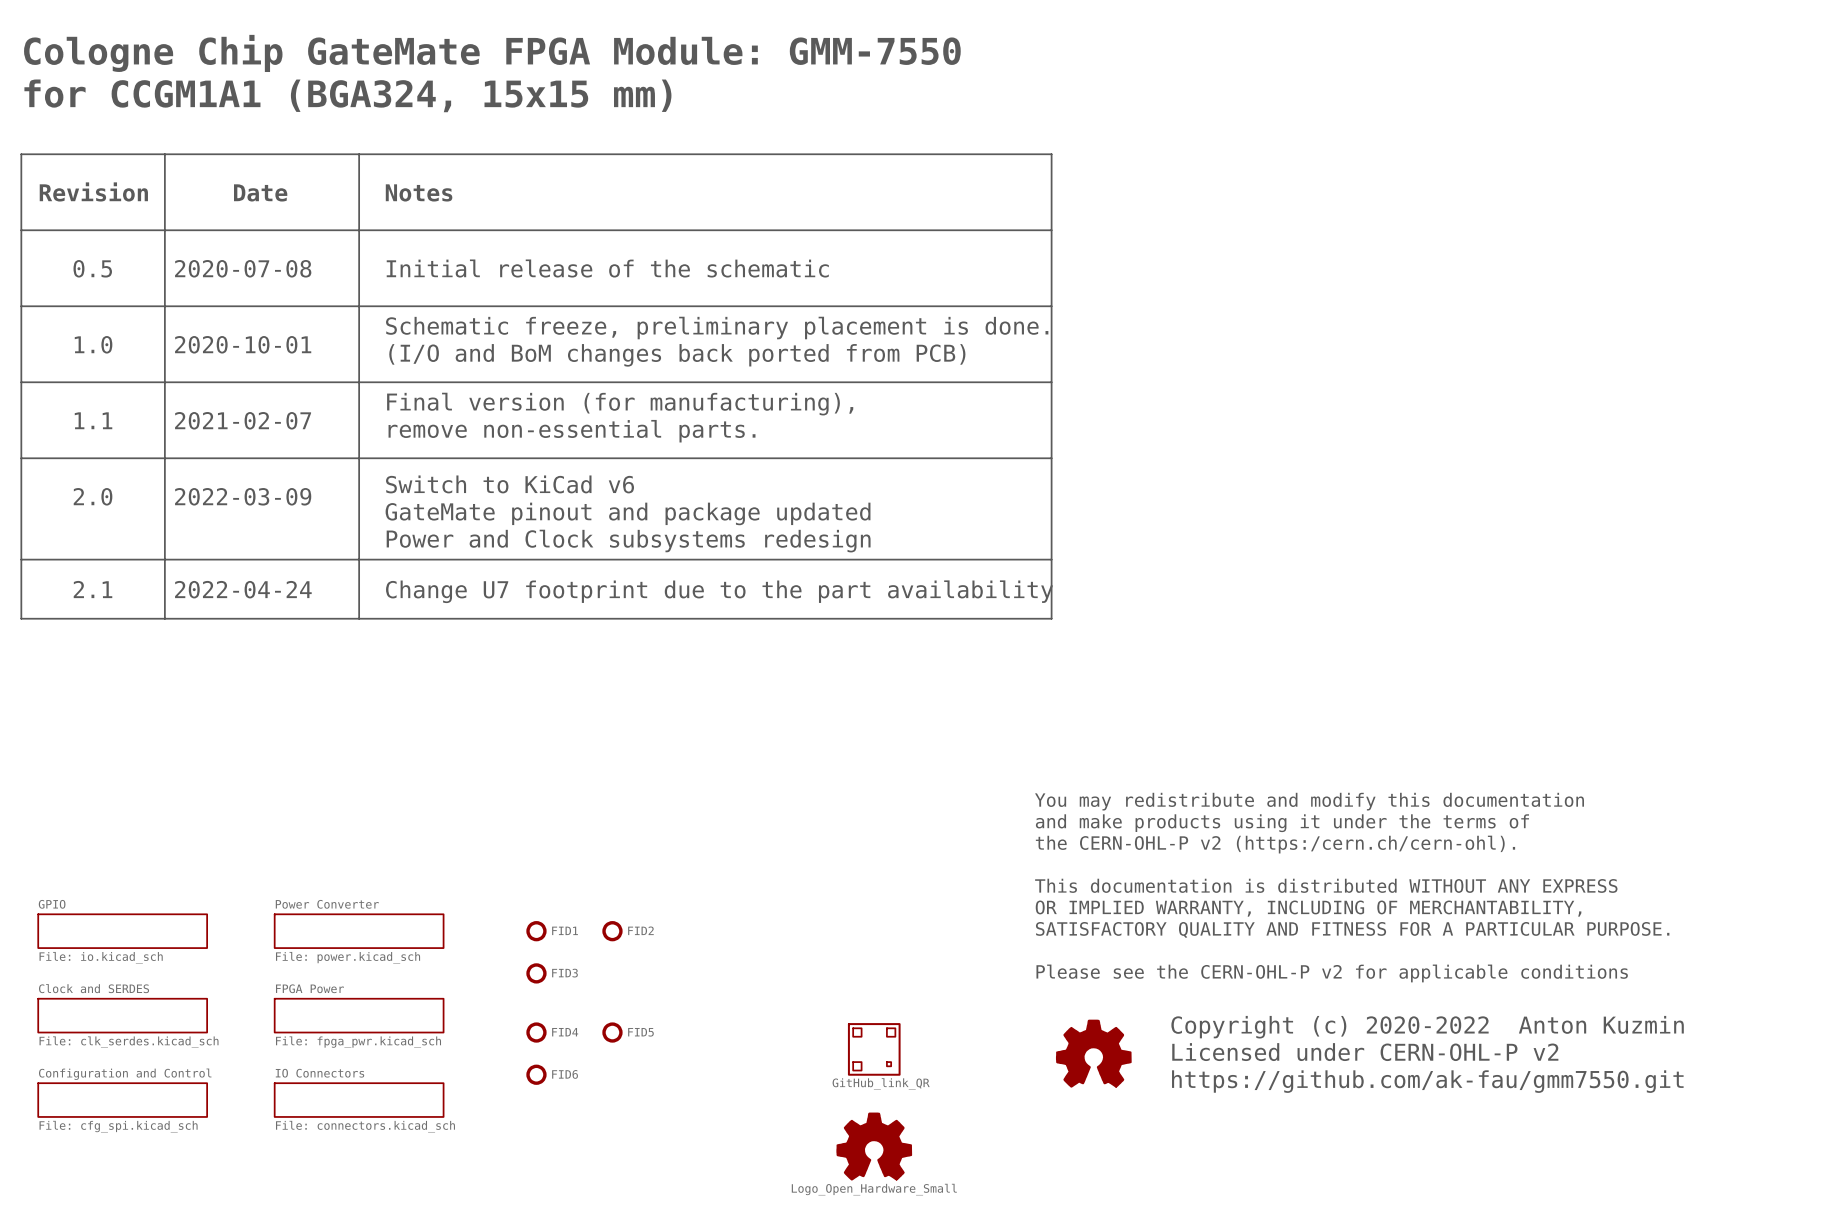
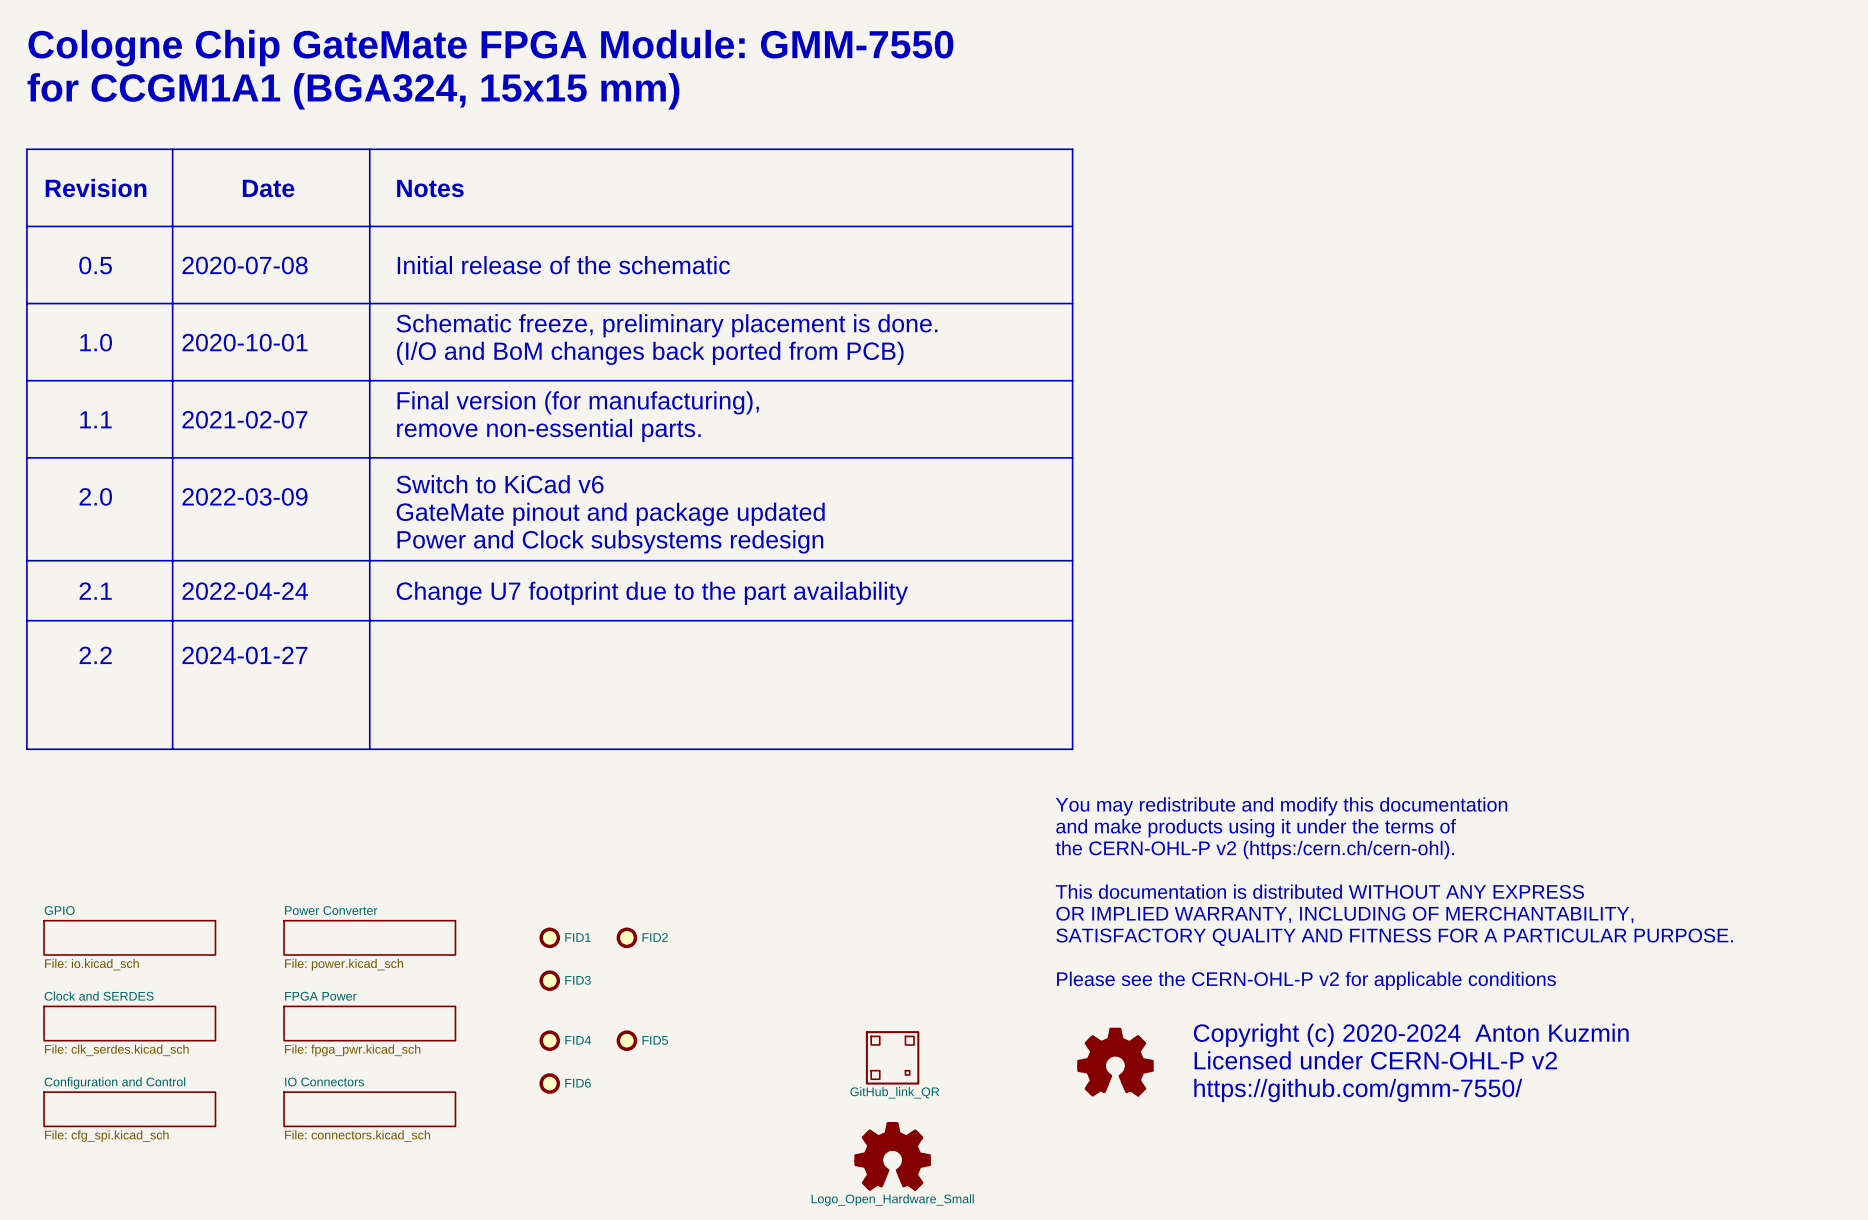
line: none -> (26, 620) (26, 749) (1072, 749) (1072, 620)
line: none -> (172, 620) (172, 749)
line: none -> (369, 620) (369, 749)
text: none -> 2.2 (95, 655)
text: none -> 2024-01-27 (244, 655)
text: Copyright (c) 2020-2022 Anton Kuzmin (1427, 1027) -> Copyright (c) 2020-2024 Anton Kuzmin (1411, 1035)
text: https://github.com/ak-fau/gmm7550.git (1427, 1081) -> https://github.com/gmm-7550/ (1358, 1090)

